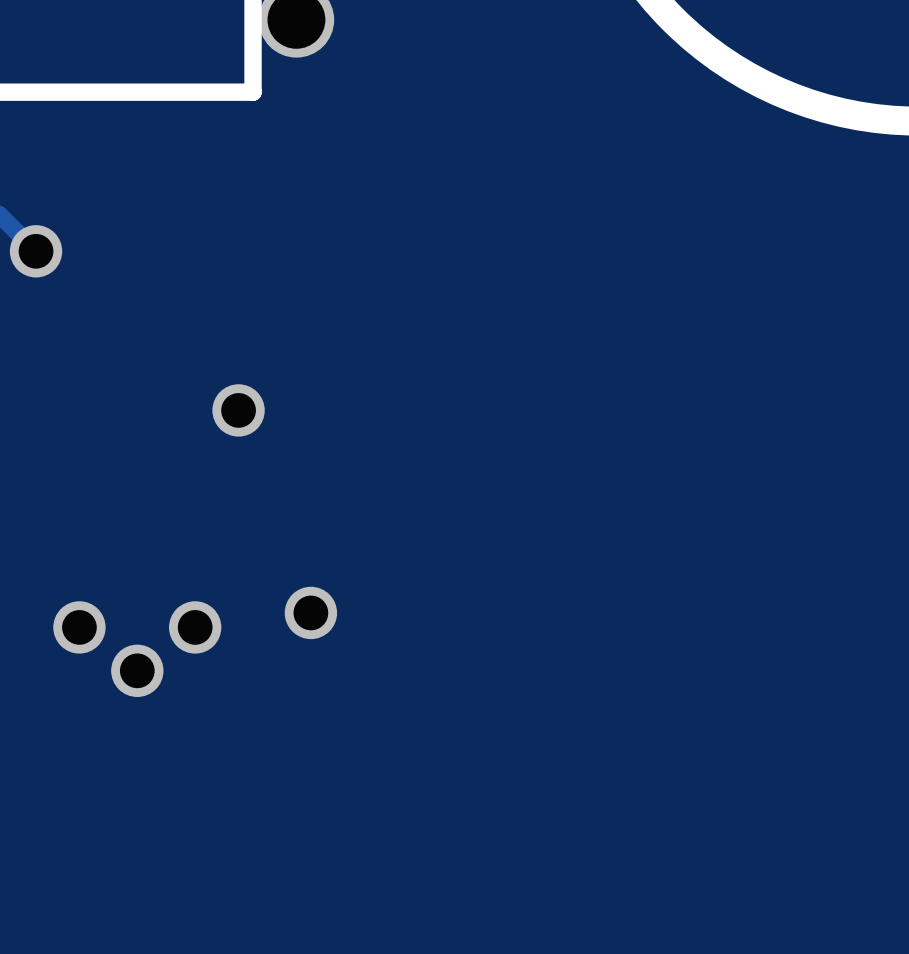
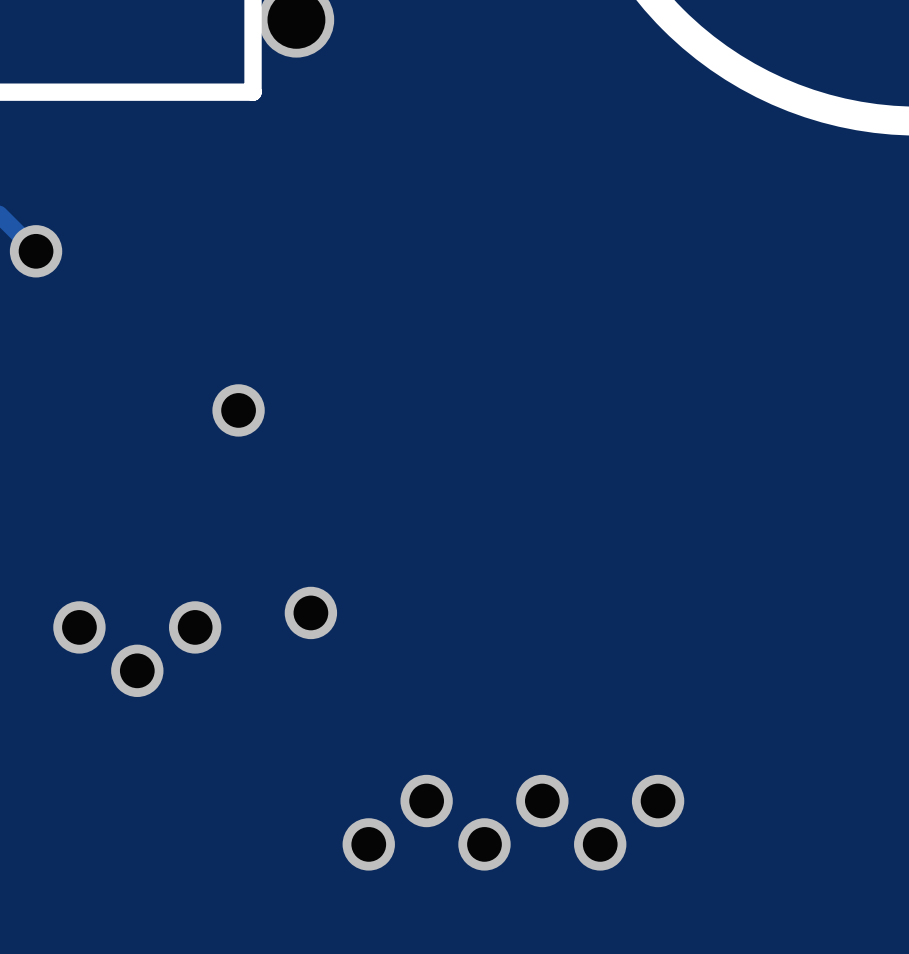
via: none -> (426, 801)
via: none -> (542, 801)
via: none -> (658, 801)
via: none -> (368, 844)
via: none -> (484, 844)
via: none -> (600, 844)

